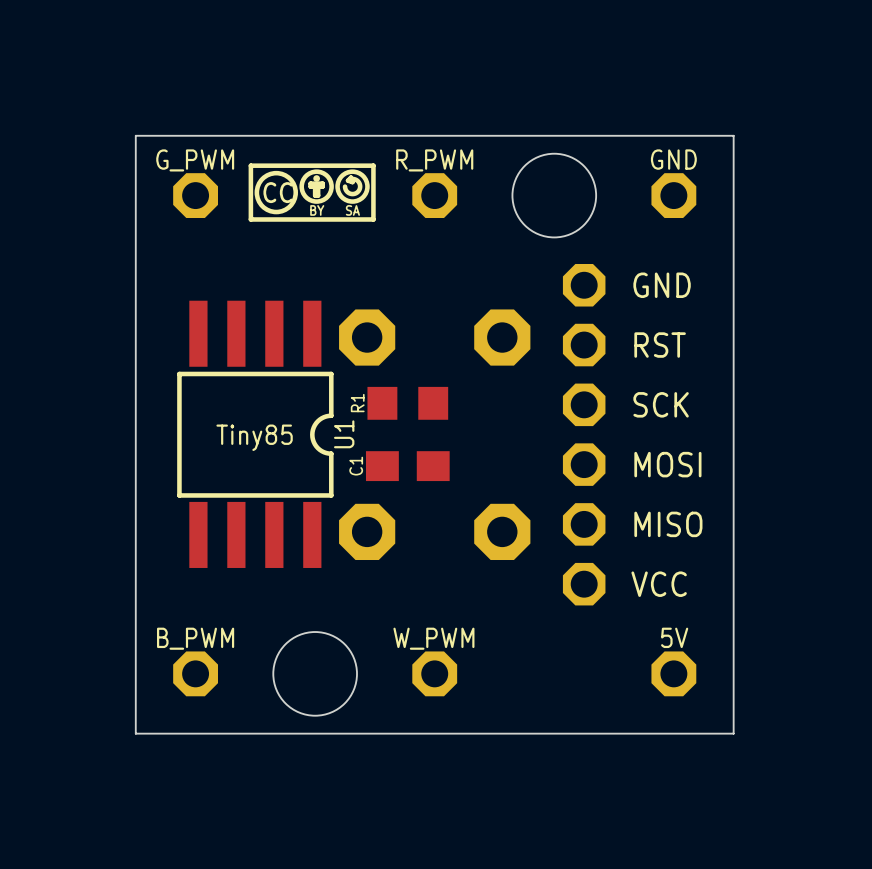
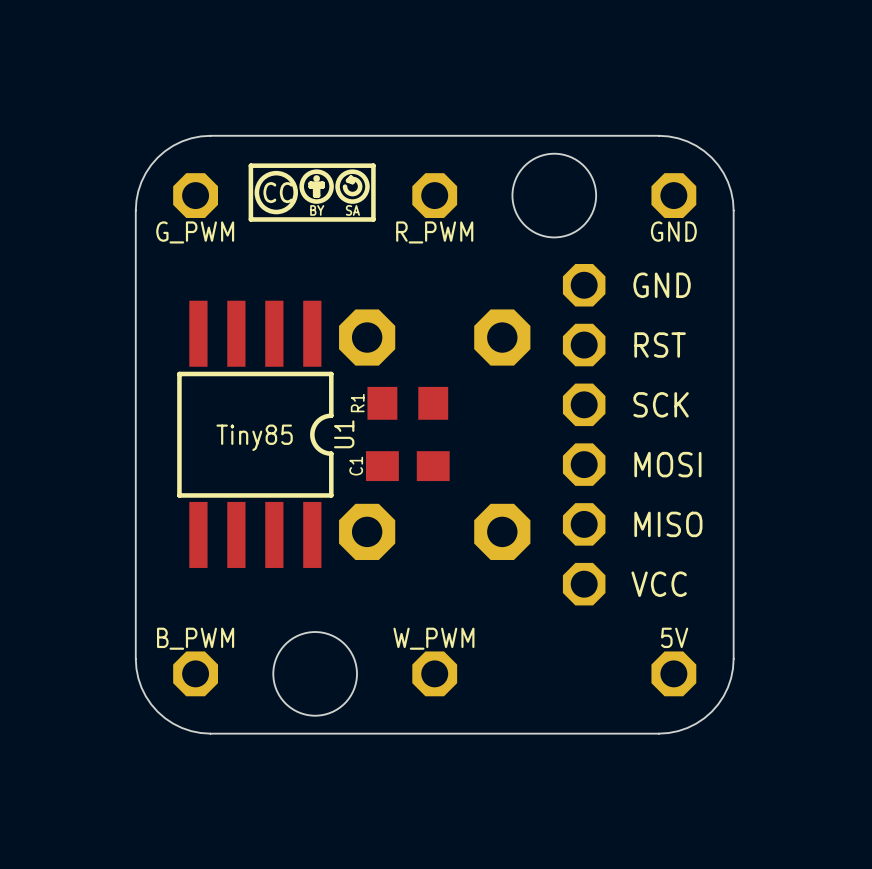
board edge: (210, 135) (135, 135) (135, 210) -> (210, 135) (181, 141) (157, 157) (141, 181) (135, 210)
board edge: (658, 135) (733, 135) (733, 210) -> (658, 135) (687, 141) (711, 157) (727, 181) (733, 210)
GND name position: GND (673, 159) -> GND (673, 231)
G_PWM name position: G_PWM (195, 160) -> G_PWM (195, 232)
R_PWM name position: R_PWM (434, 160) -> R_PWM (434, 232)
board edge: (135, 658) (135, 733) (210, 733) -> (135, 658) (141, 687) (157, 711) (181, 727) (210, 733)
board edge: (733, 658) (733, 733) (658, 733) -> (733, 658) (727, 687) (711, 711) (687, 727) (658, 733)

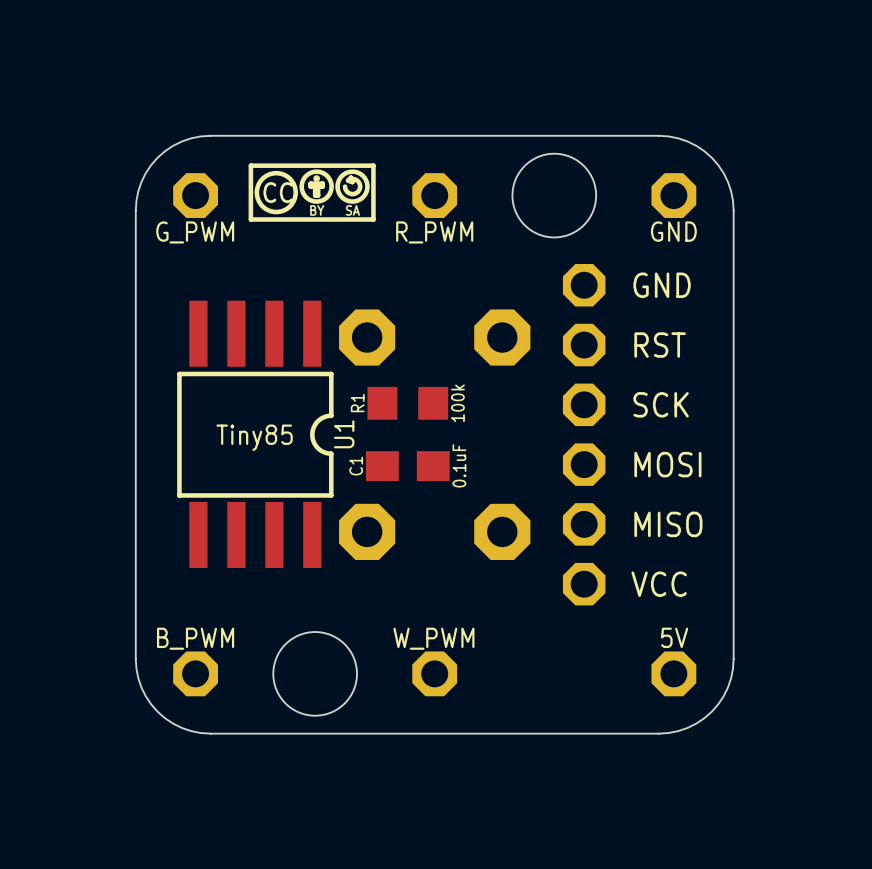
R1 value: none -> 100k (457, 403)
C1 value: none -> 0.1uF (459, 465)

